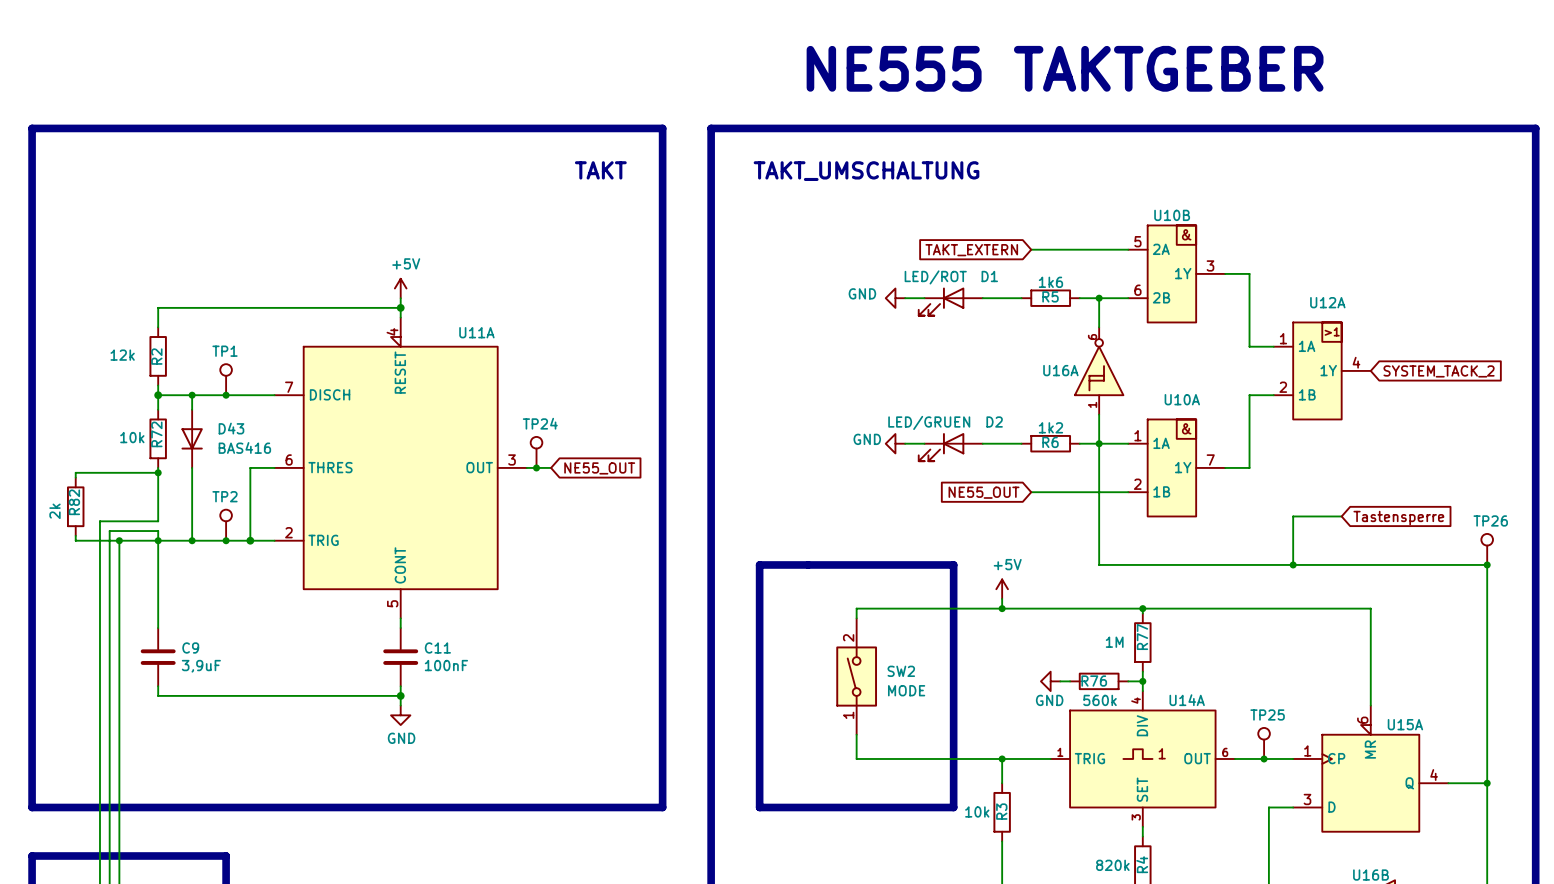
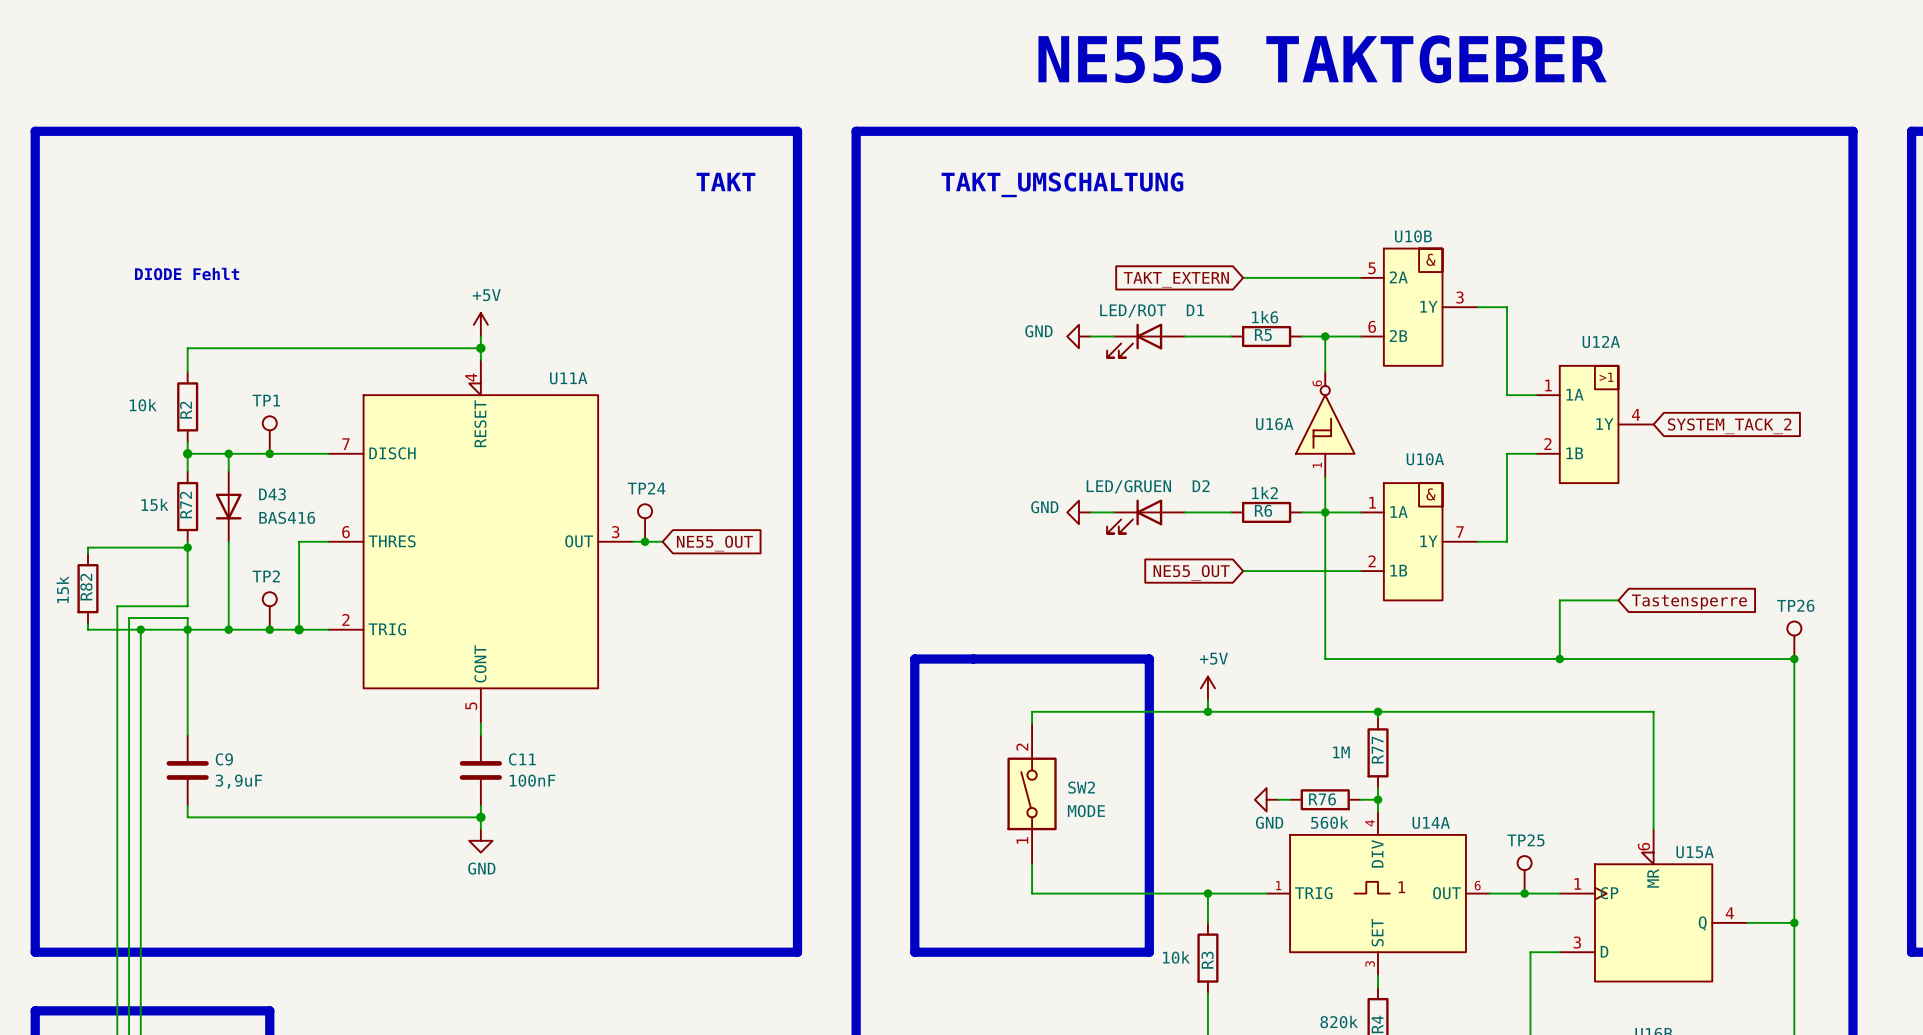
text: none -> DIODE Fehlt (187, 274)
R2 value: 12k (122, 355) -> 10k (143, 405)
R72 value: 10k (132, 437) -> 15k (154, 504)
R82 value: 2k (54, 511) -> 15k (62, 589)

